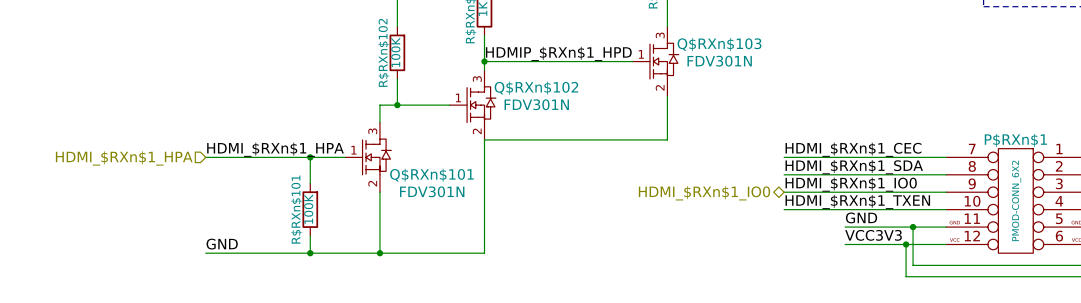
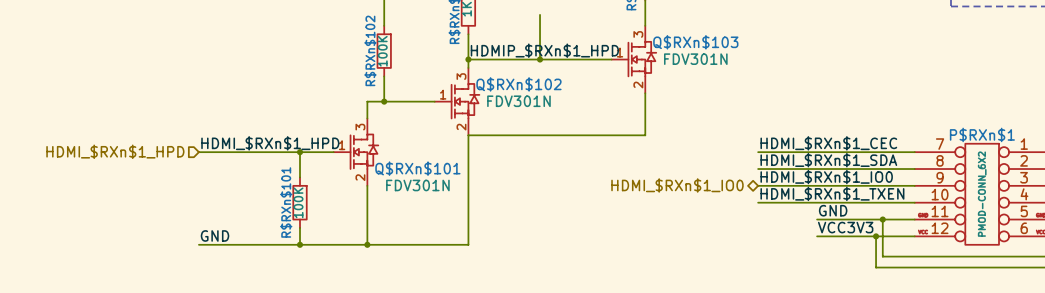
wire: none -> (540, 14) (540, 59)
junction: none -> (540, 59)
label: HDMI_$RXn$1_HPA (275, 149) -> HDMI_$RXn$1_HPD (270, 143)
hierarchical label: HDMI_$RXn$1_HPA (124, 158) -> HDMI_$RXn$1_HPD (115, 151)

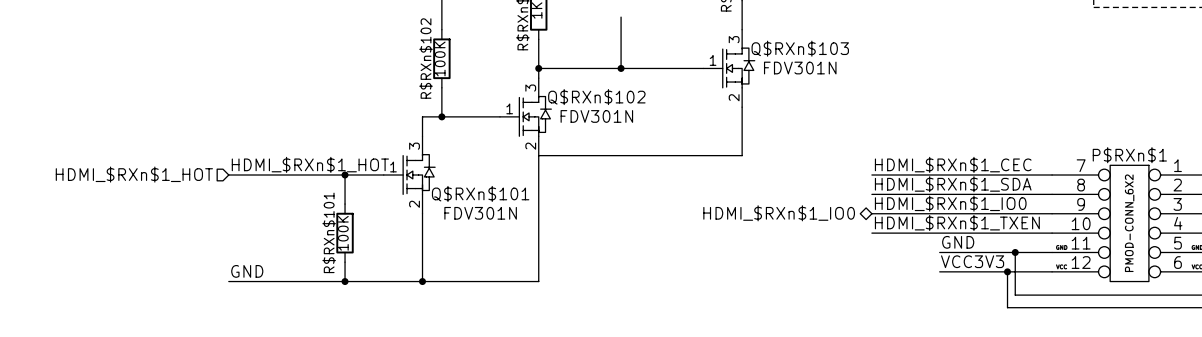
label: HDMIP_$RXn$1_HPD (544, 50) -> none
label: HDMI_$RXn$1_HPD (270, 143) -> HDMI_$RXn$1_HOT (310, 164)
hierarchical label: HDMI_$RXn$1_HPD (115, 151) -> HDMI_$RXn$1_HOT (134, 174)

